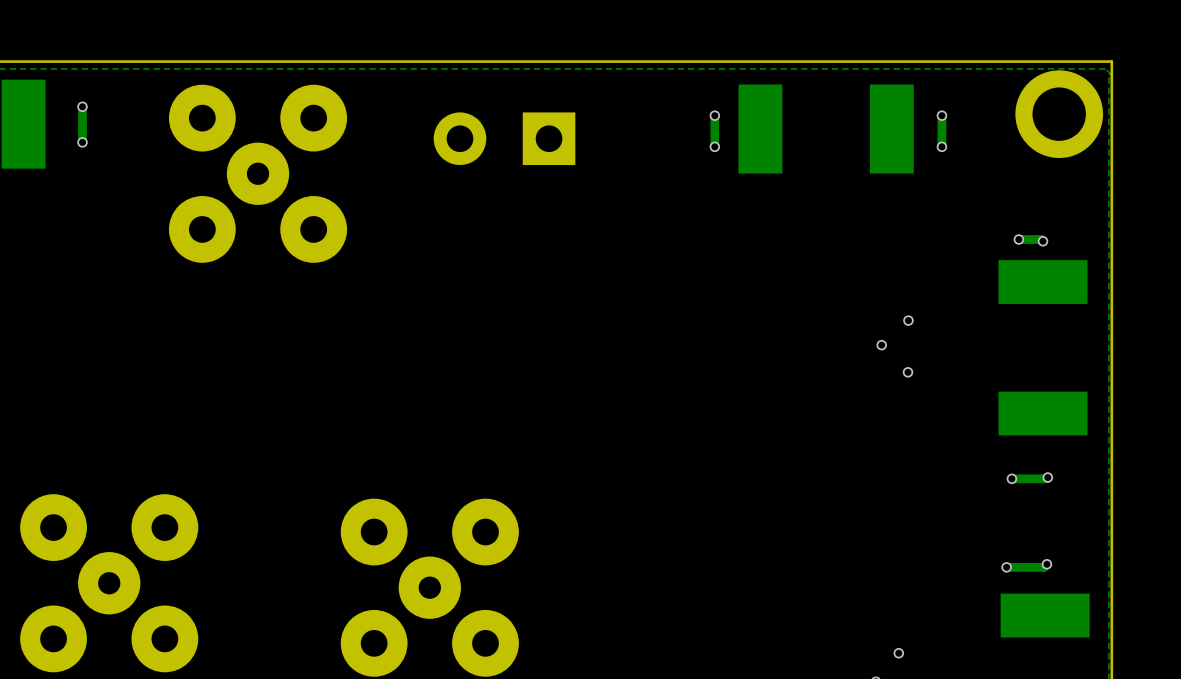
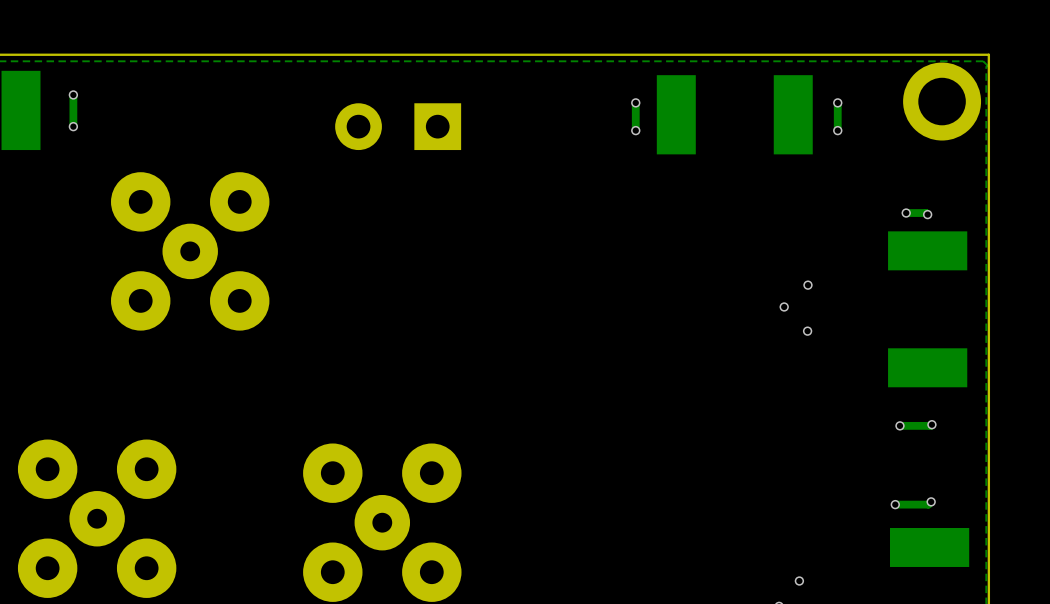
part position: (504, 138) -> (398, 126)
part position: (258, 173) -> (190, 251)

